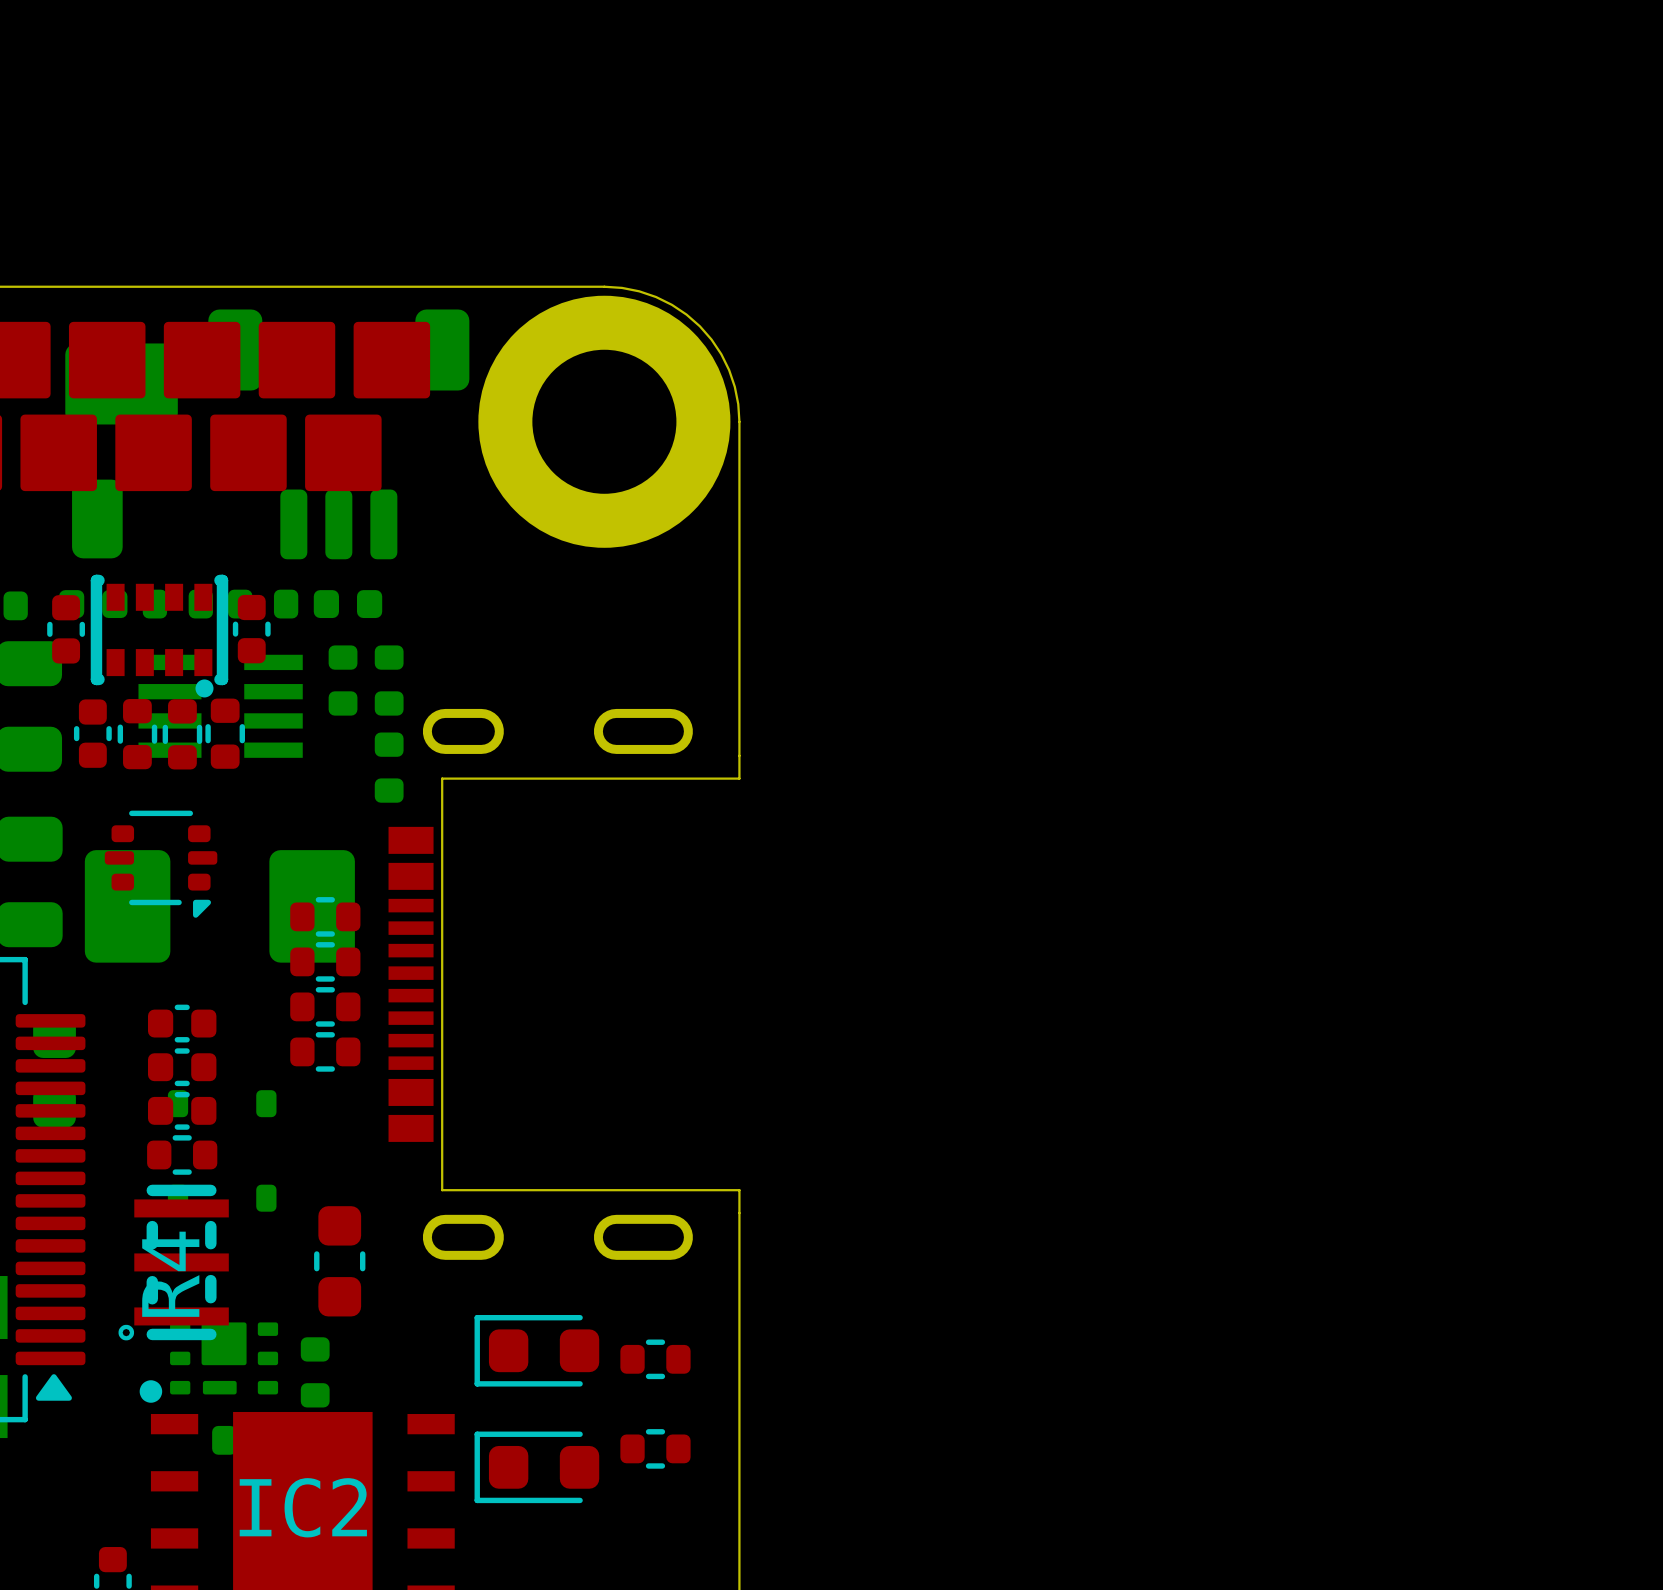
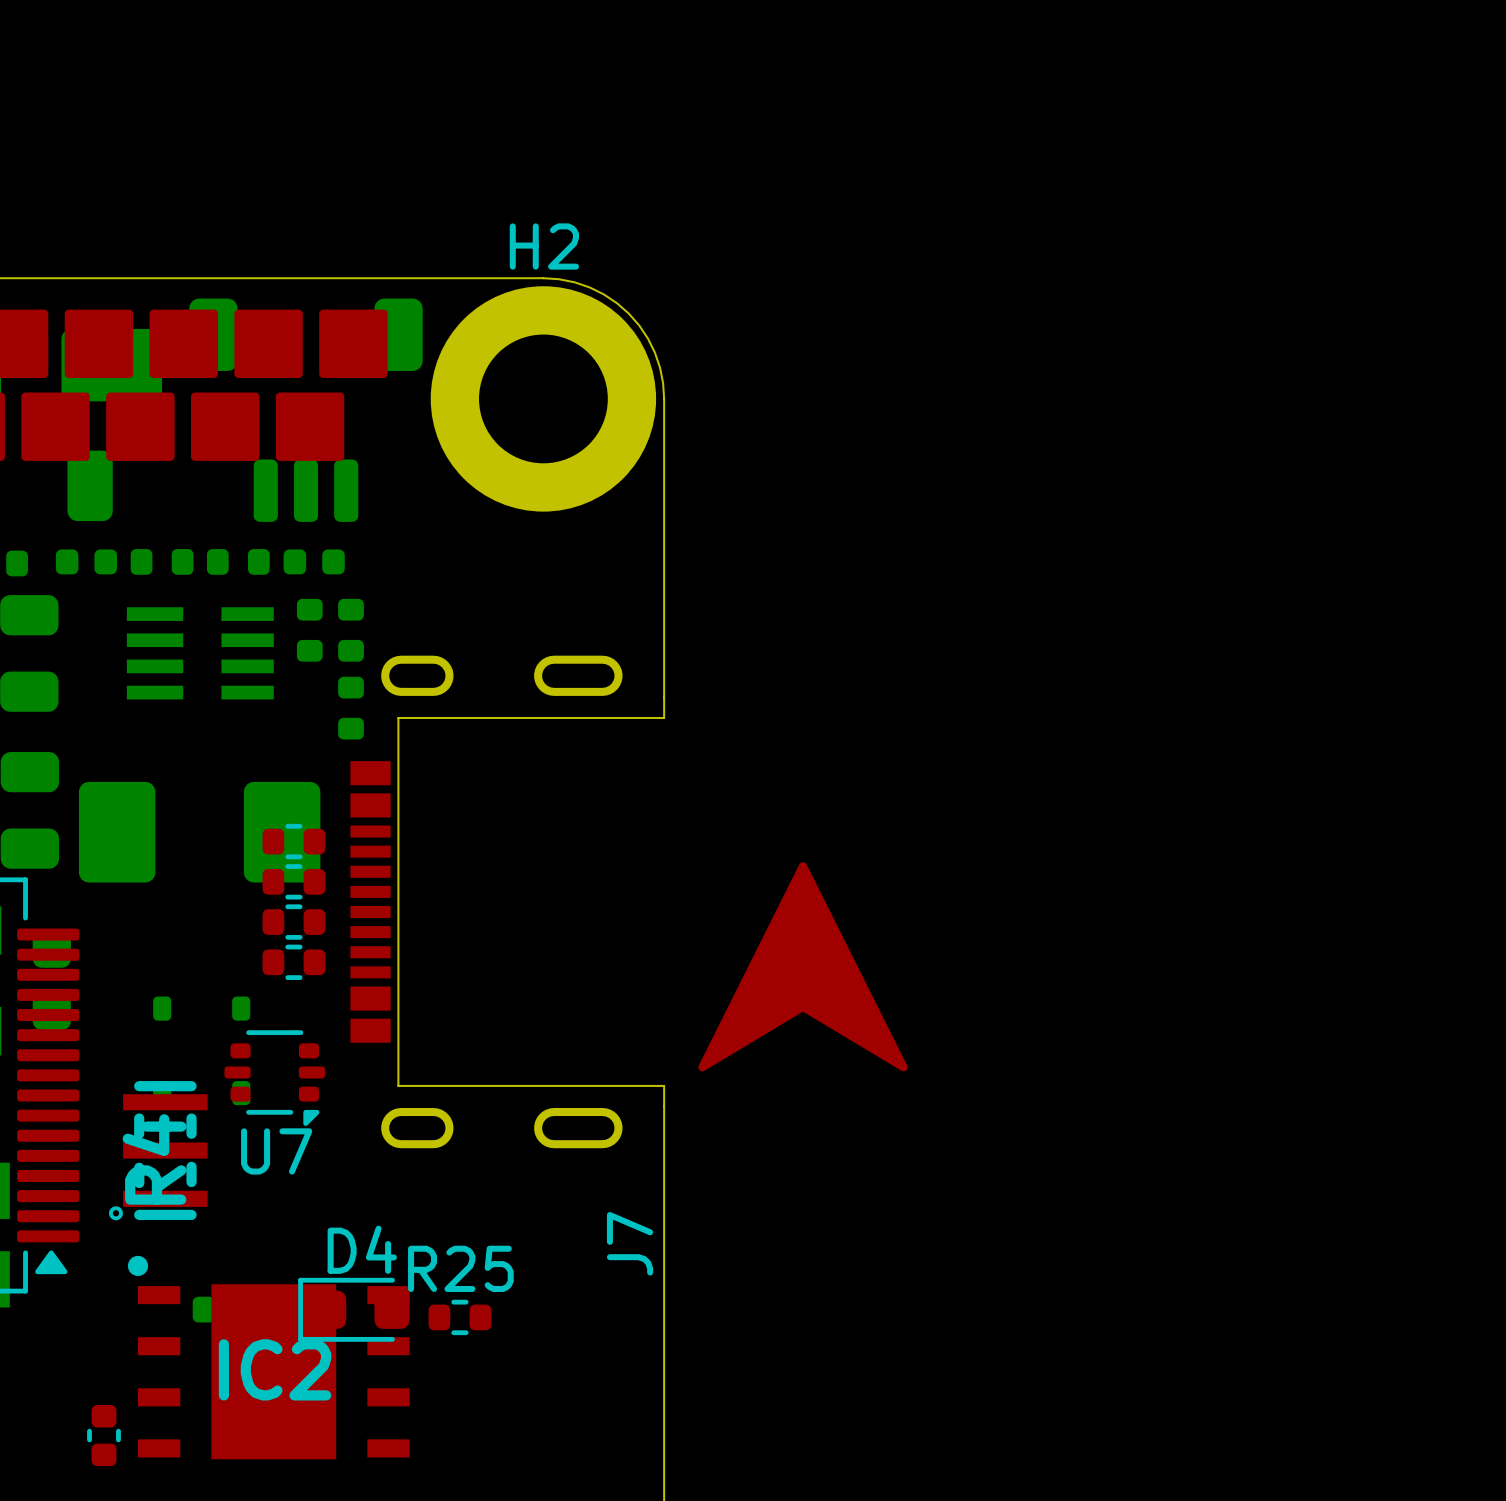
H2 name: none -> H2 (544, 246)
part: (66, 629) -> none
part: (251, 629) -> none
part: (159, 636) -> none
part: (92, 733) -> none
part: (225, 733) -> none
part: (137, 734) -> none
part: (182, 734) -> none
part: (161, 864) -> none
drawing: none -> [698, 862, 908, 1072]
part: (182, 1023) -> none
part: (182, 1067) -> none
part: (182, 1110) -> none
part: (182, 1154) -> none
U7: none -> (274, 1078)
part: (339, 1261) -> none
part: (536, 1350) -> none
part: (224, 1358) -> none
part: (655, 1359) -> none
part: (315, 1372) -> none
J7 name: none -> J7 (630, 1243)
D4: none -> (353, 1309)
part: (655, 1448) -> none
R25: none -> (459, 1317)
part: (536, 1467) -> none

